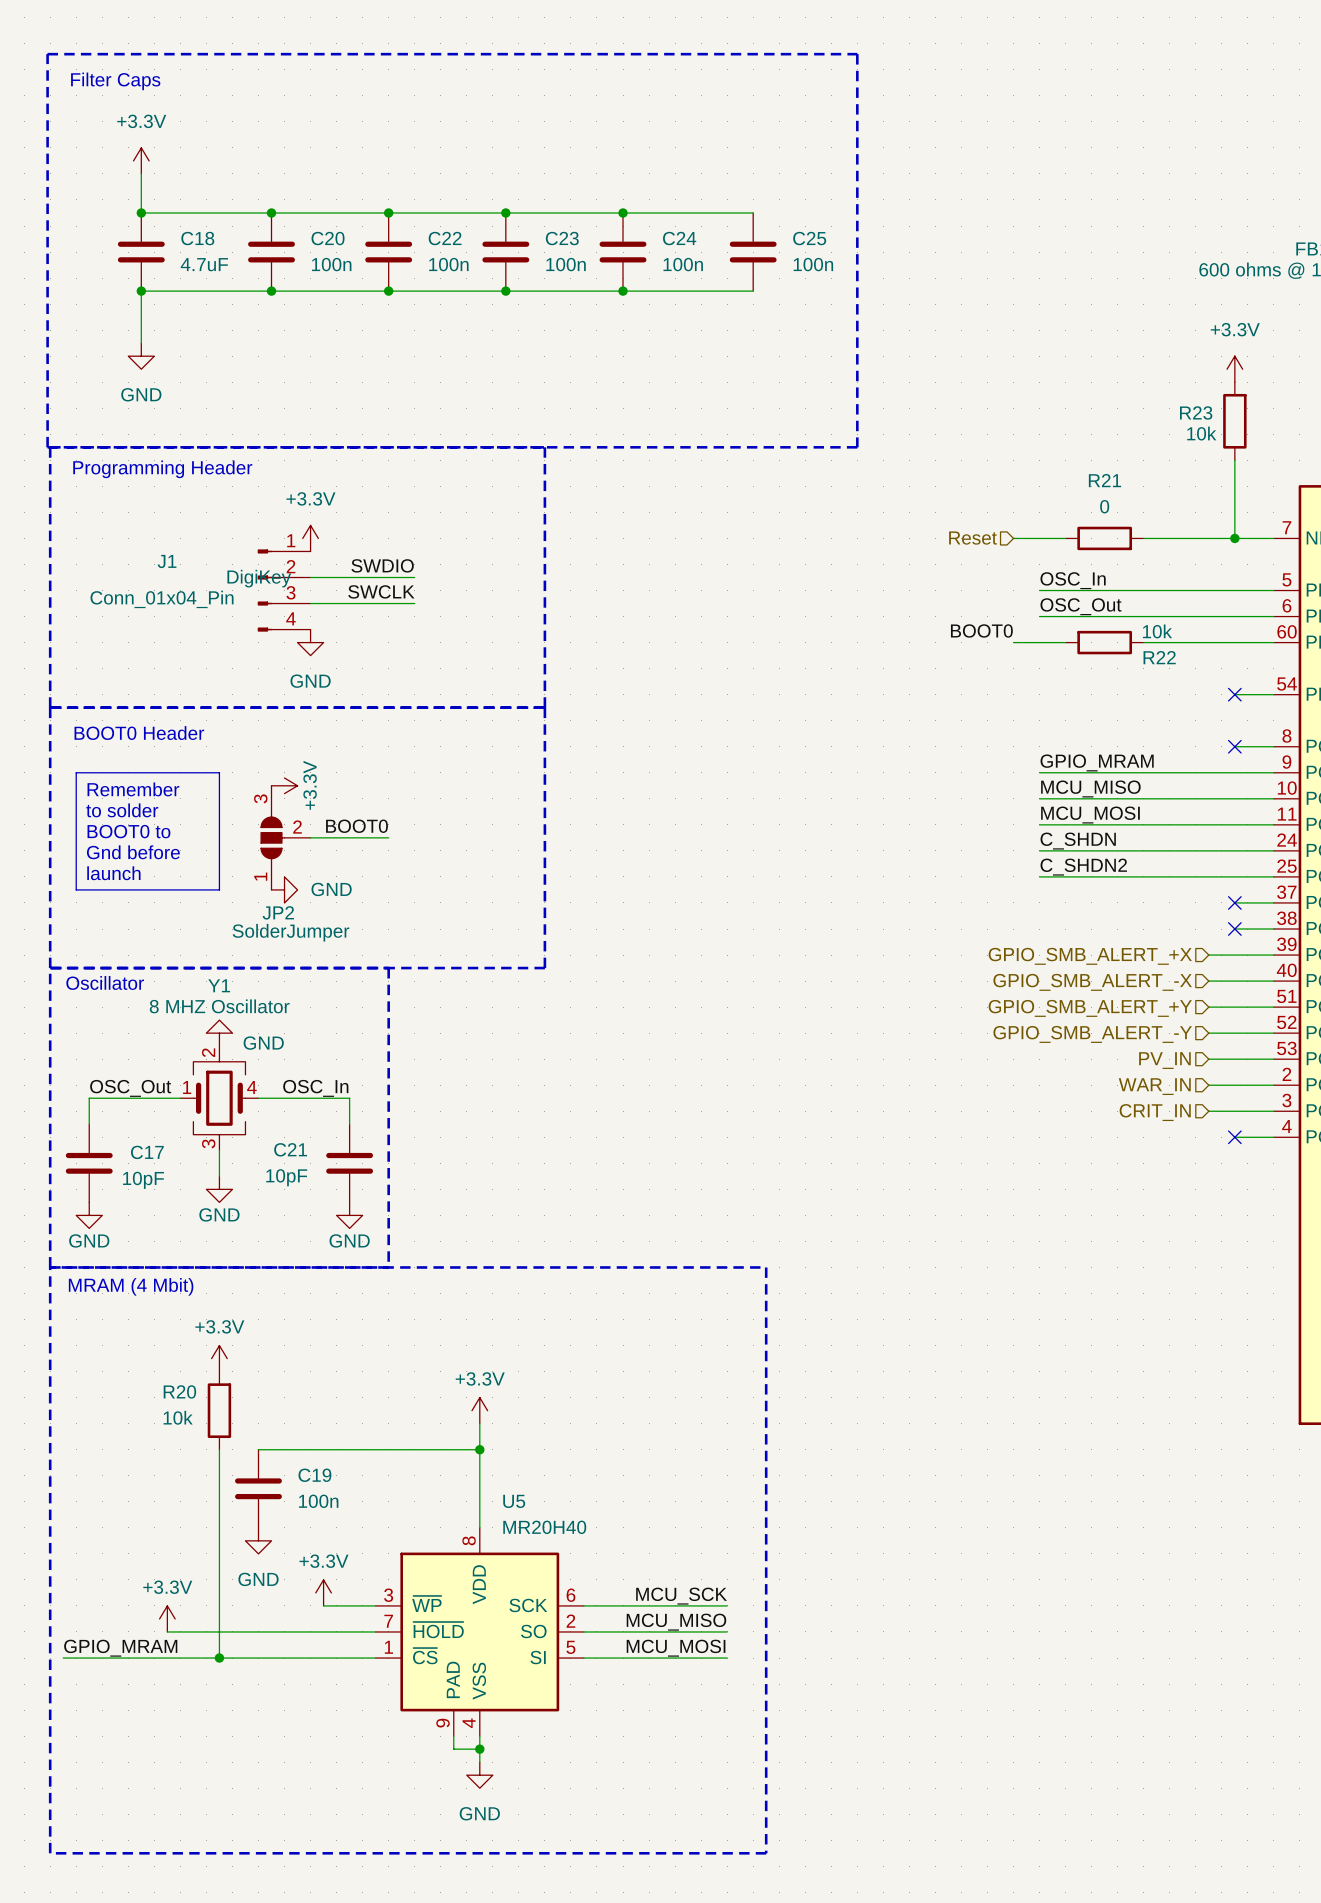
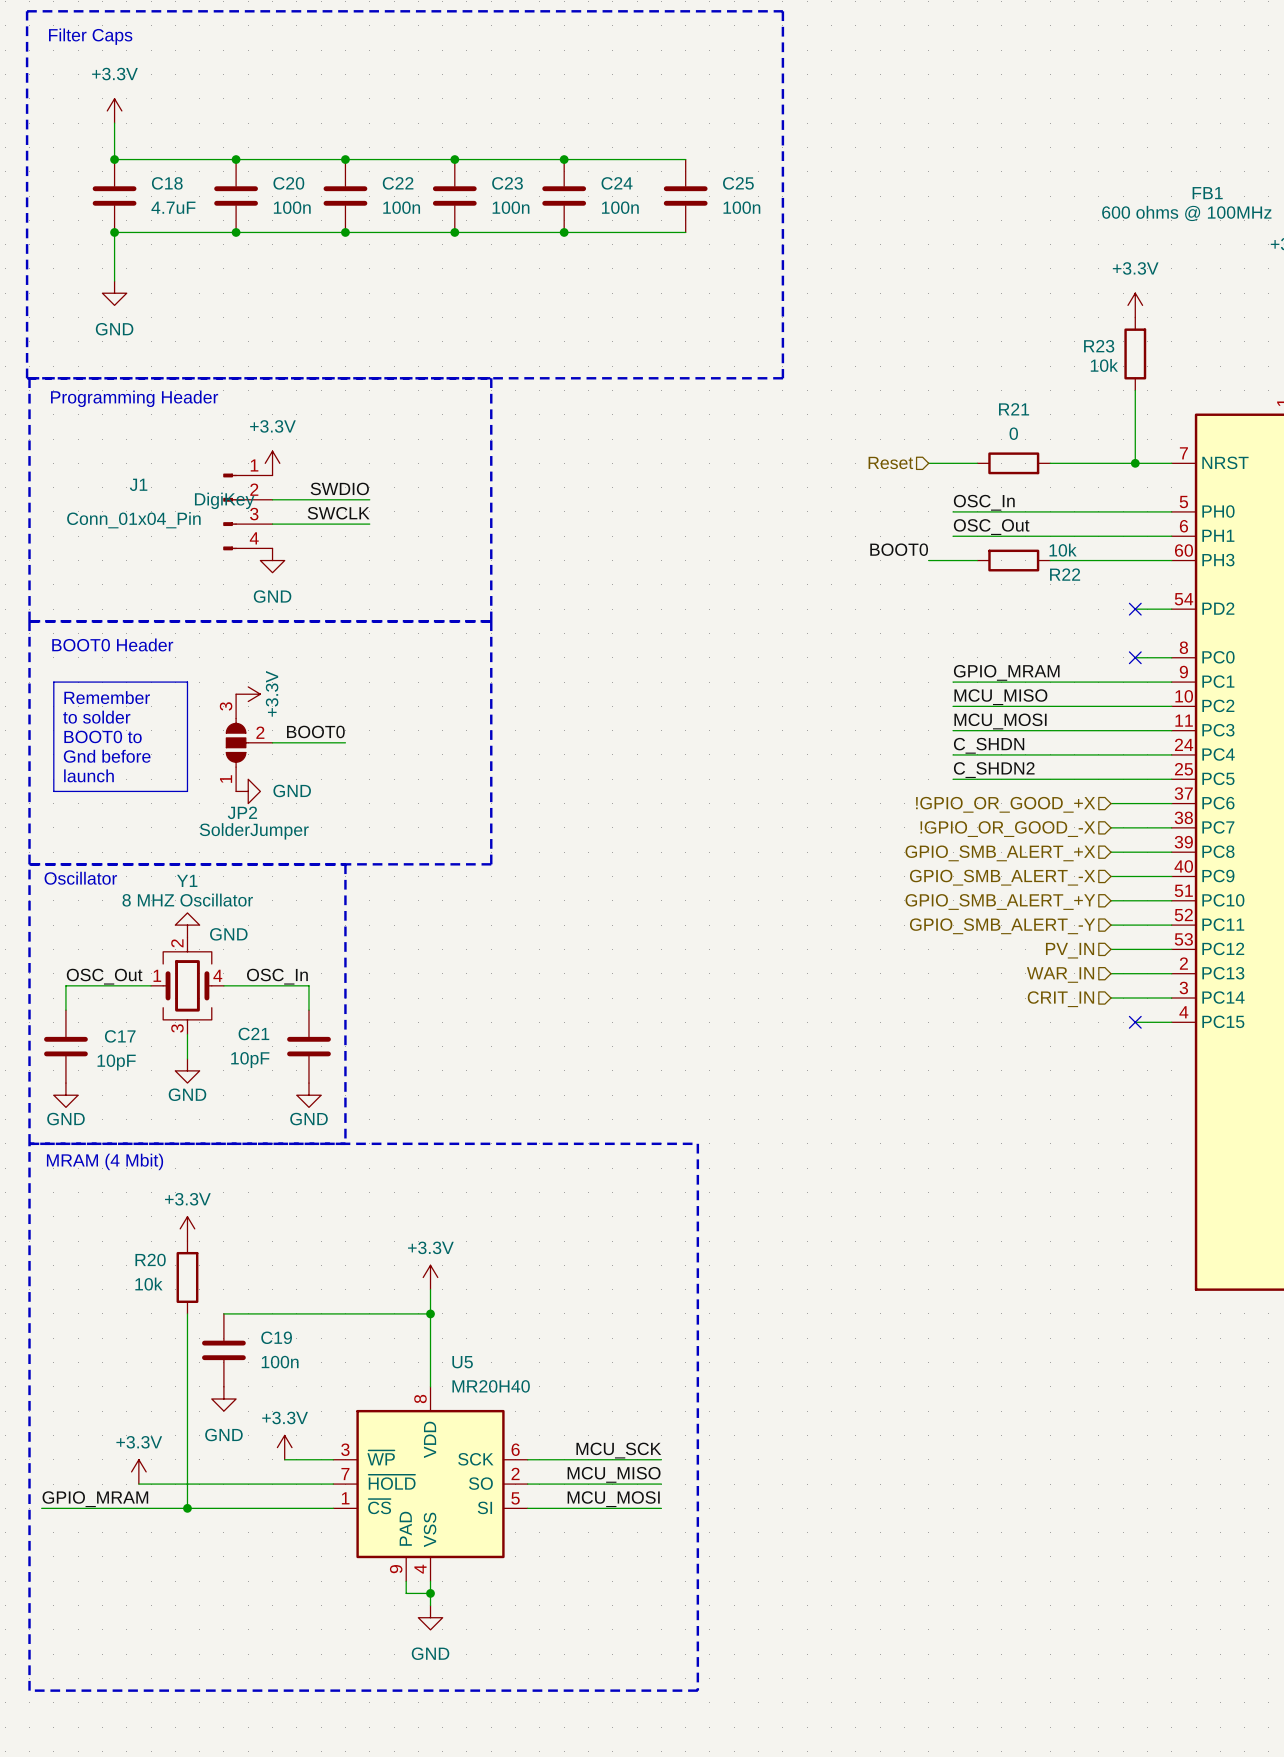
wire: none -> (1110, 803) (1135, 803)
no-connect mark: (1234, 902) -> none
hierarchical label: none -> !GPIO_OR_GOOD_+X (1005, 804)
wire: none -> (1110, 827) (1135, 827)
no-connect mark: (1234, 929) -> none
hierarchical label: none -> !GPIO_OR_GOOD_-X (1007, 829)

